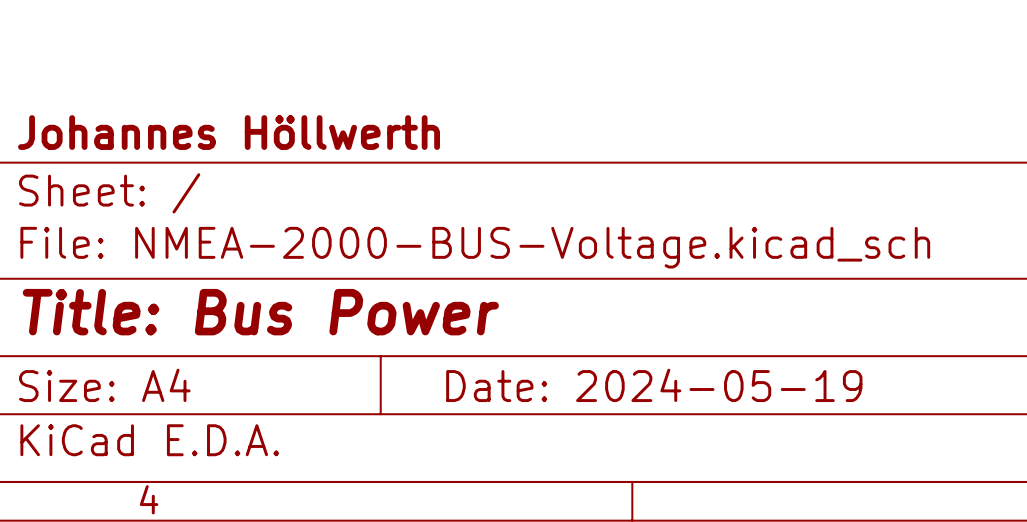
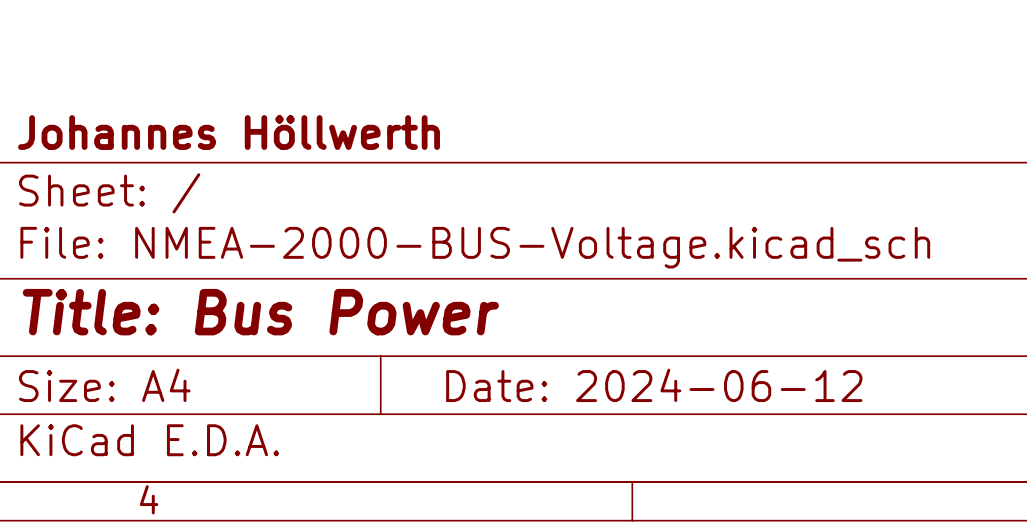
title block: Date: 2024-05-19 (654, 385) -> Date: 2024-06-12 (654, 385)

